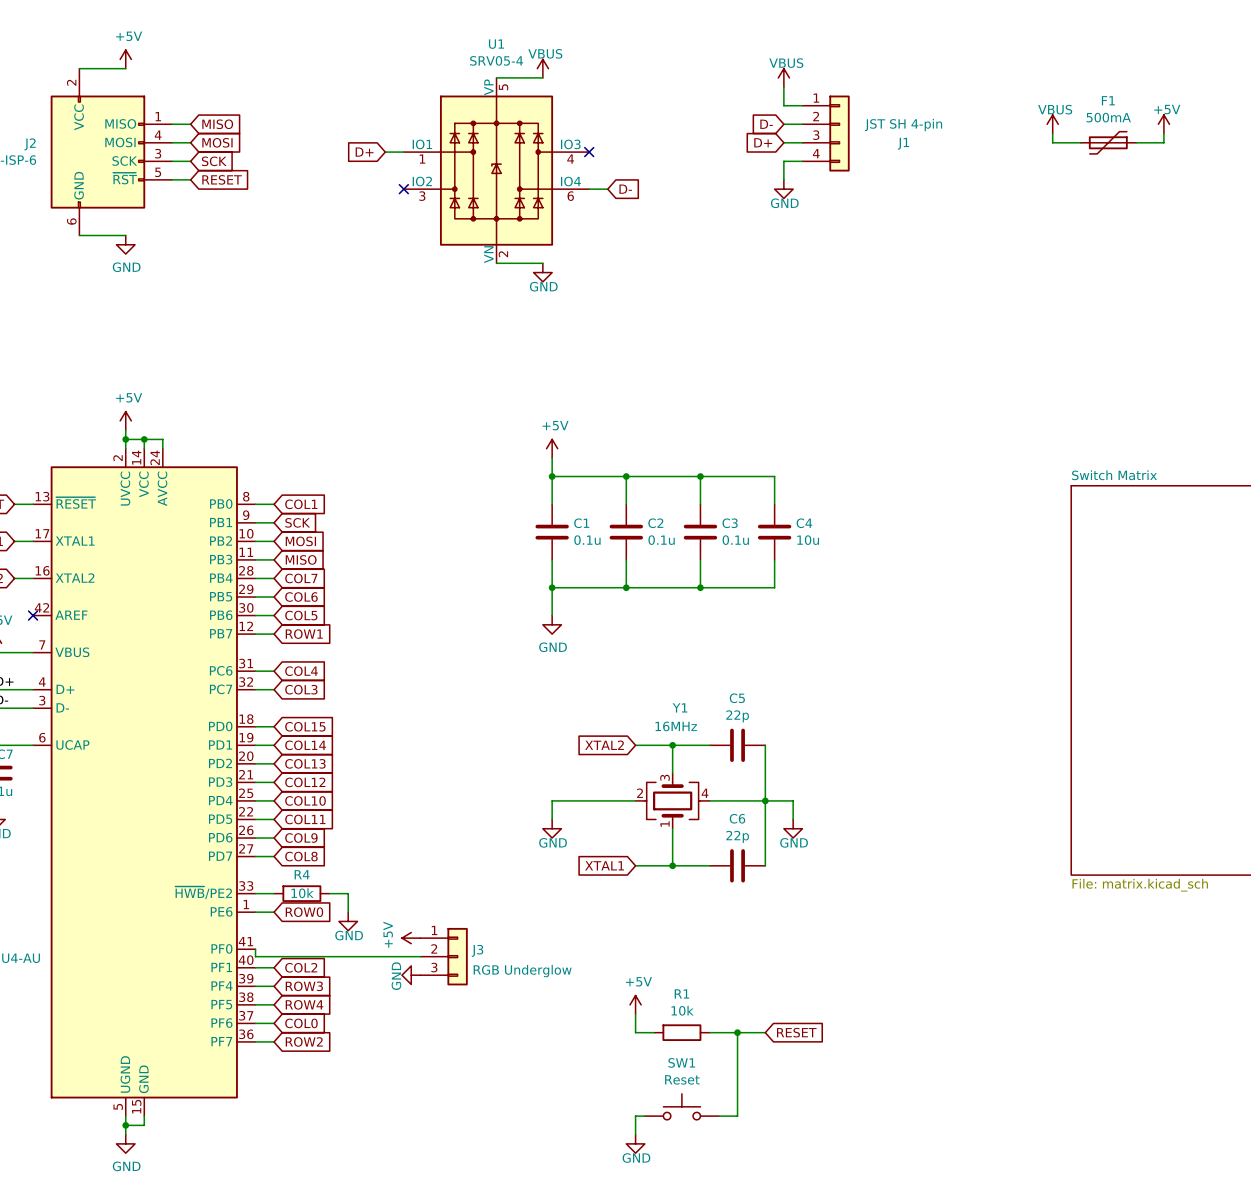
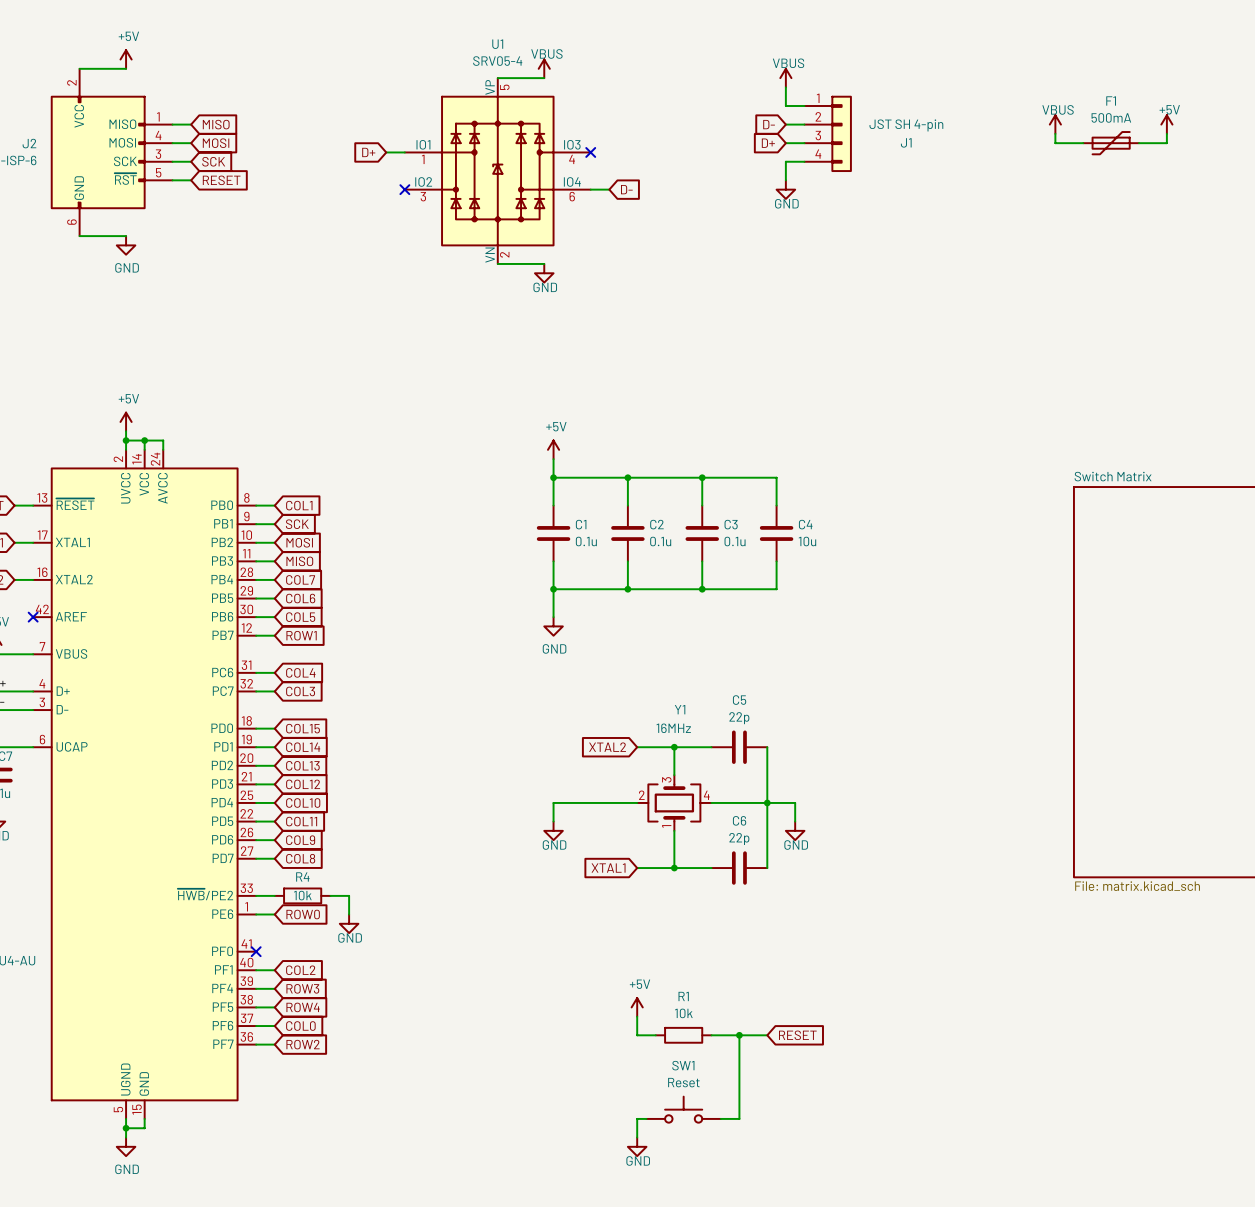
power symbol: +5V (411, 938) -> none
wire: (255, 949) (255, 956) (420, 956) -> none
no-connect mark: none -> (256, 951)
J3: RGB Underglow (444, 956) -> none
power symbol: GND (411, 975) -> none

